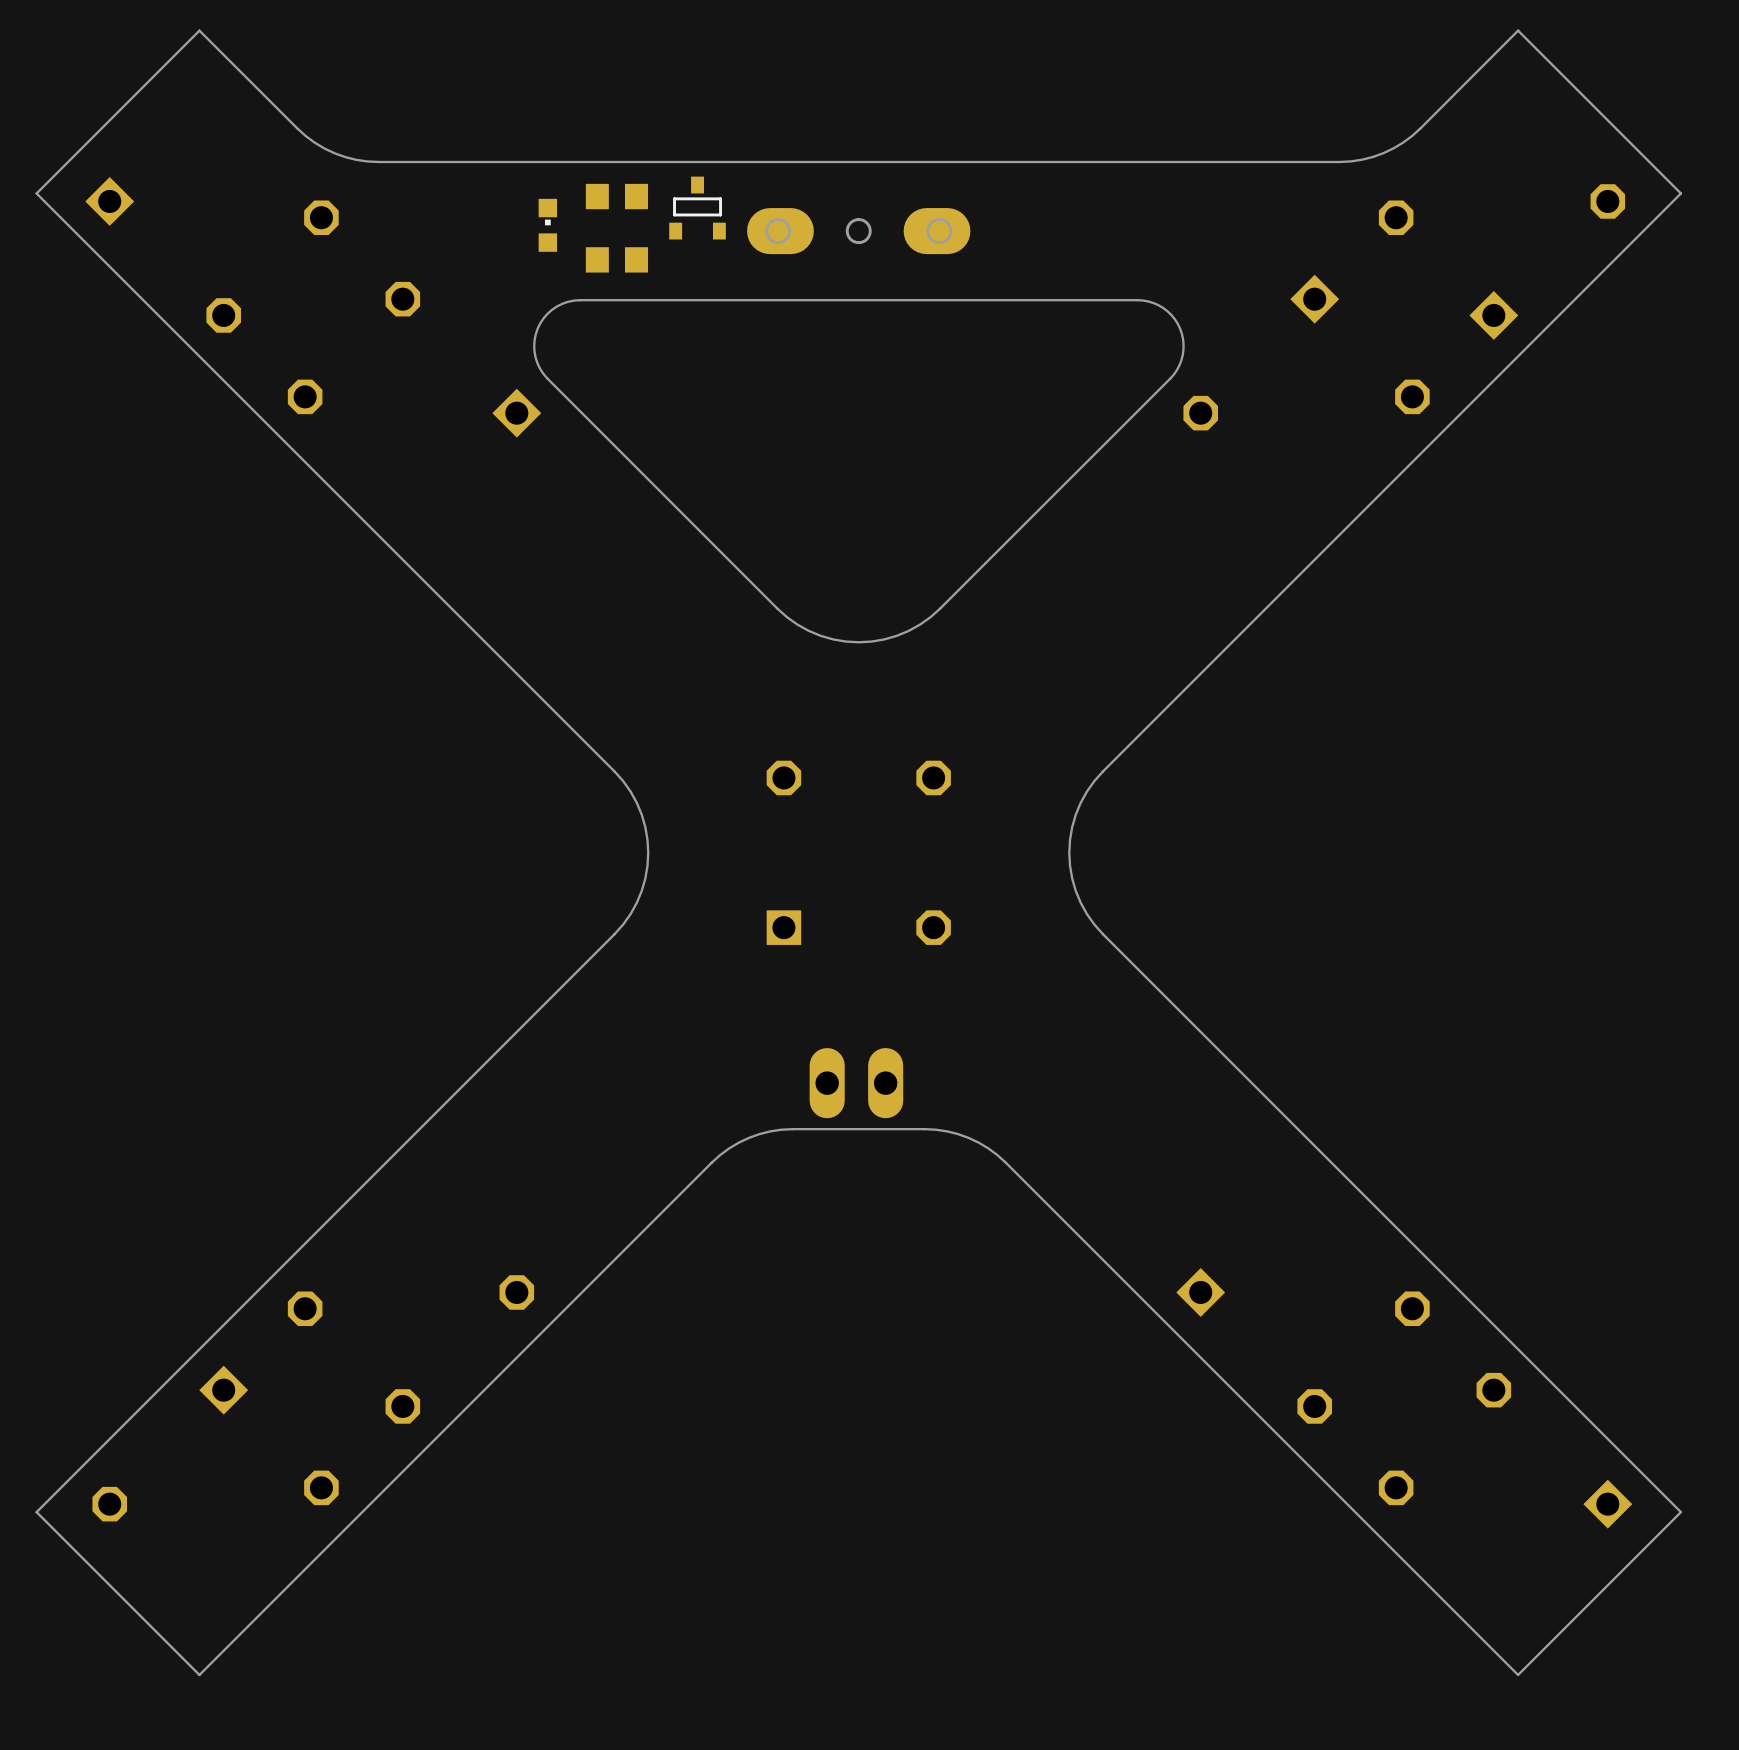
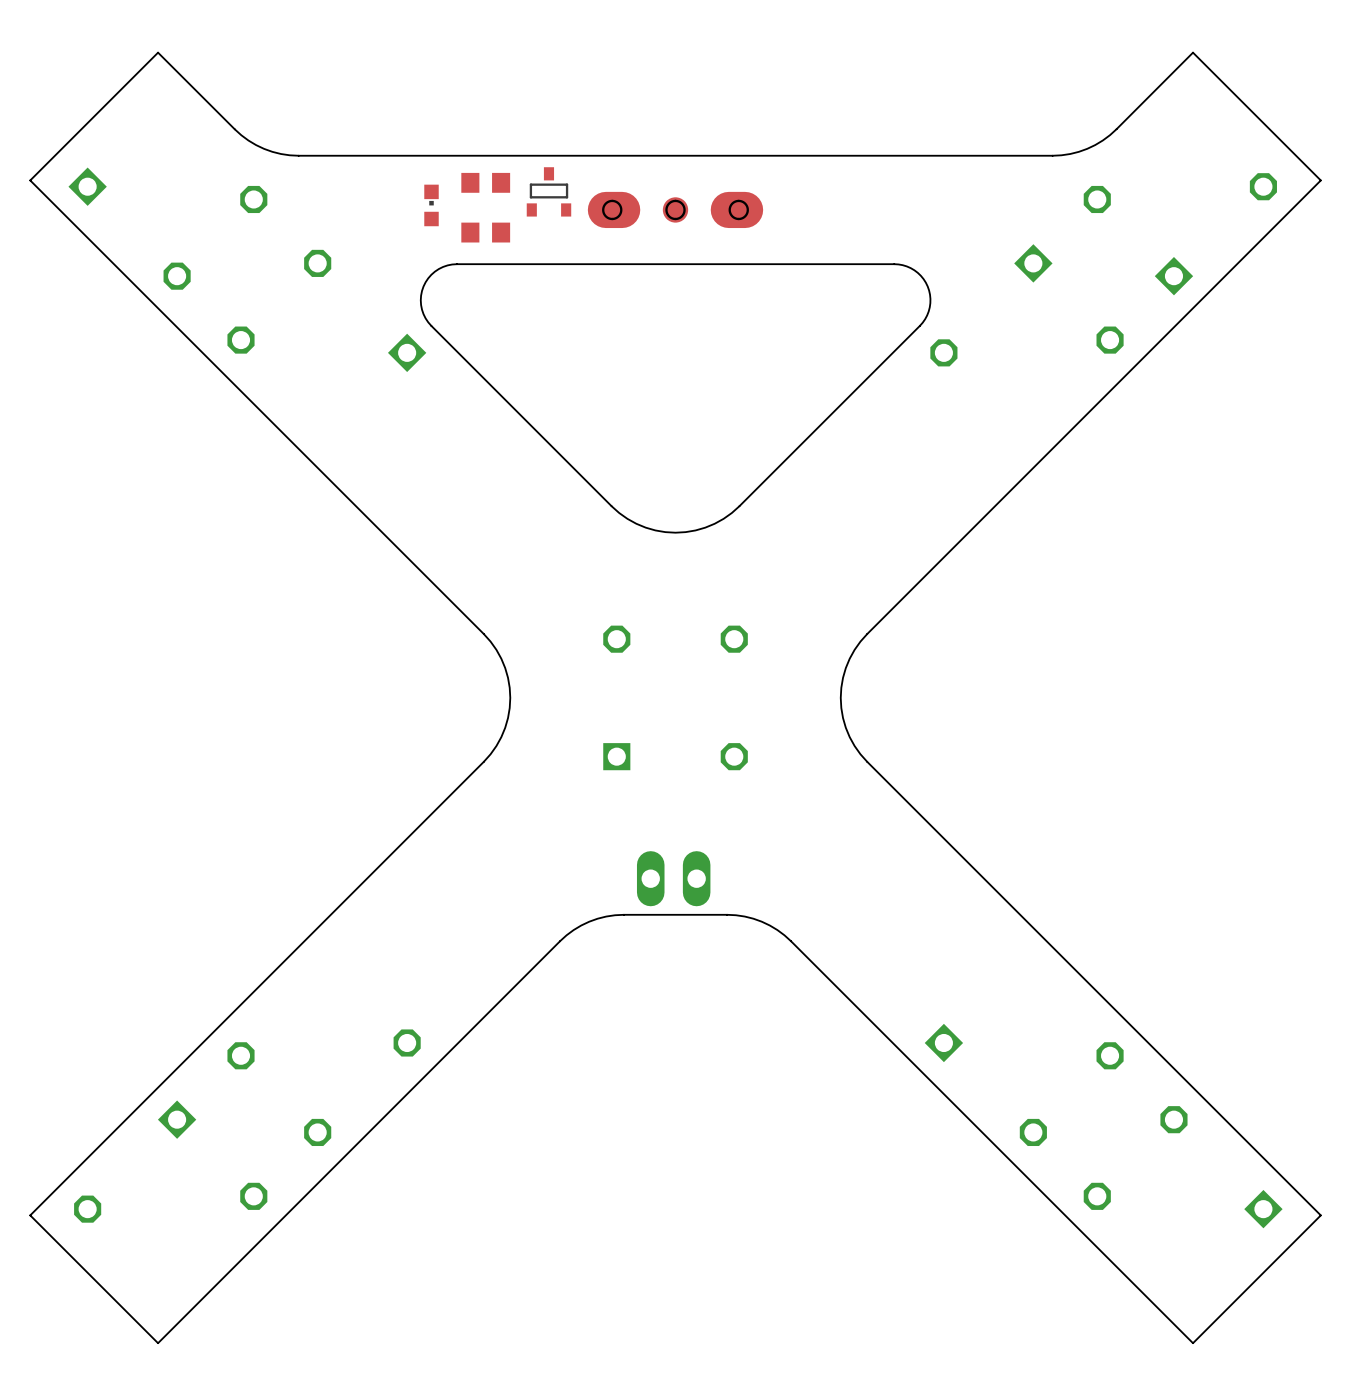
part footprint: [747, 208, 971, 255] -> [587, 191, 764, 229]

